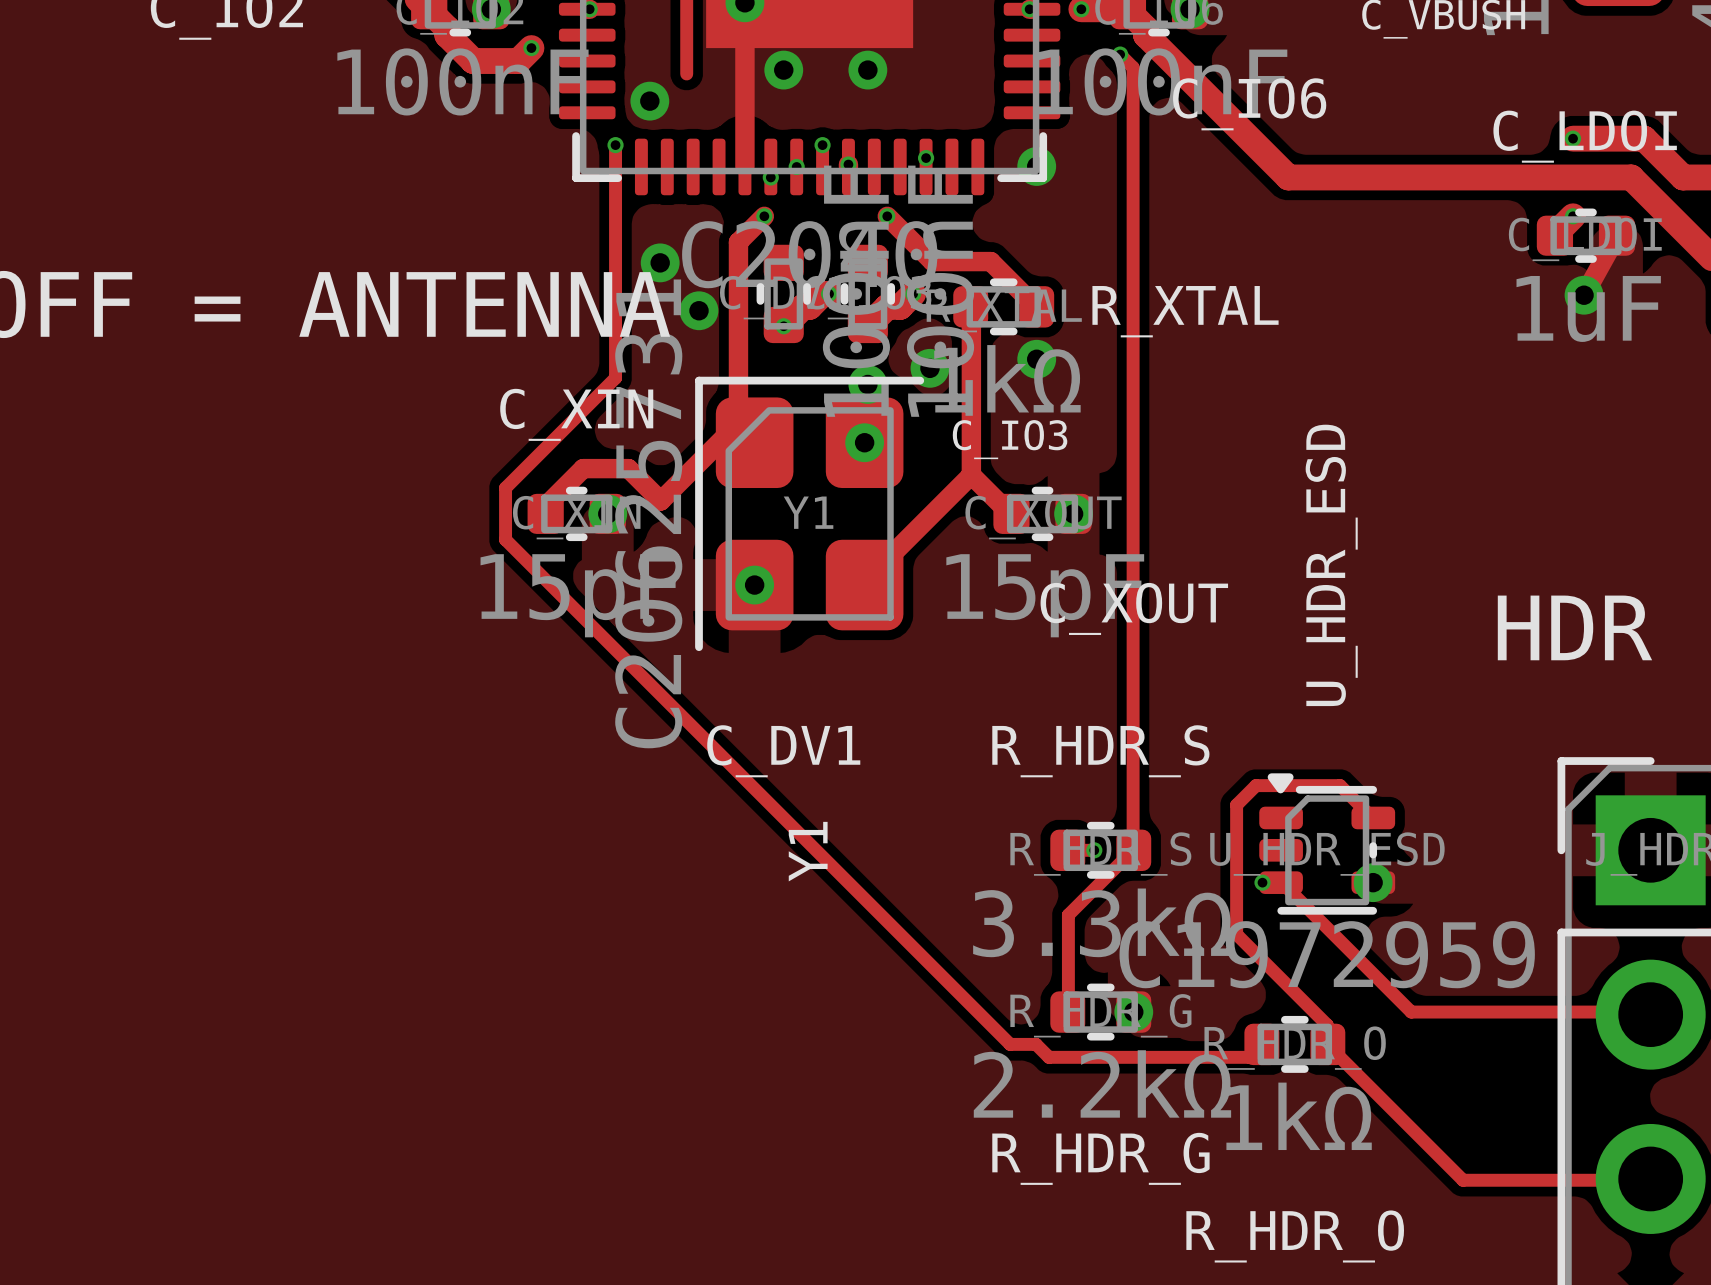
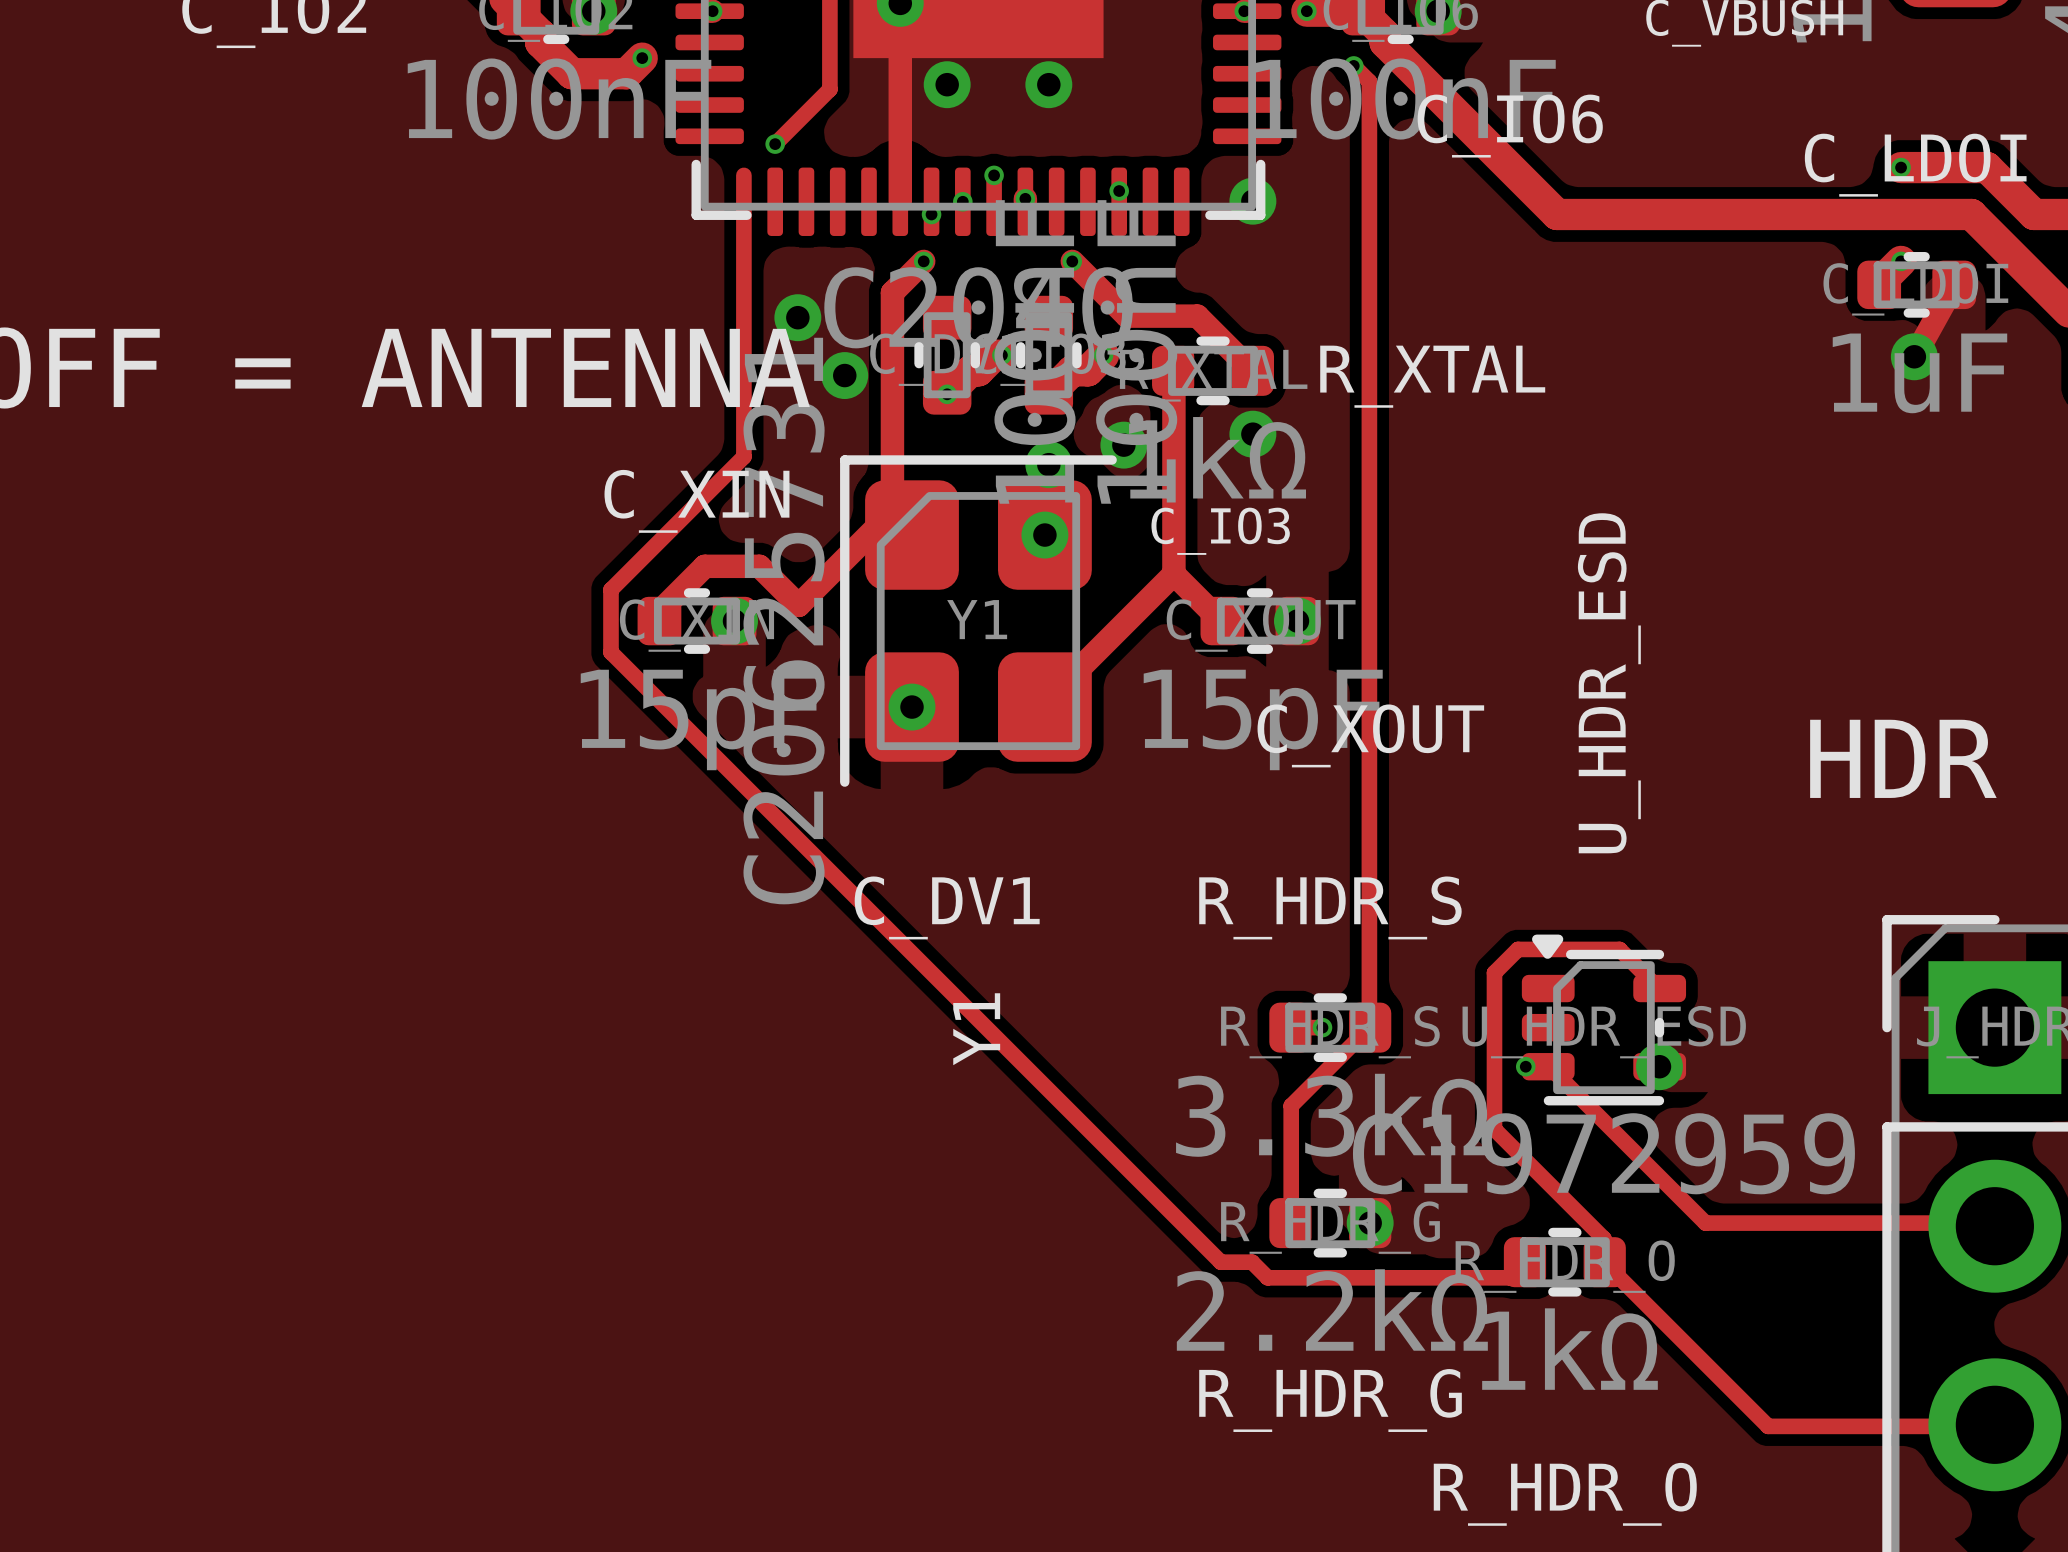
track: none -> (829, 89) (775, 144)
via: (649, 101) -> none
via position: (615, 145) -> (775, 144)

